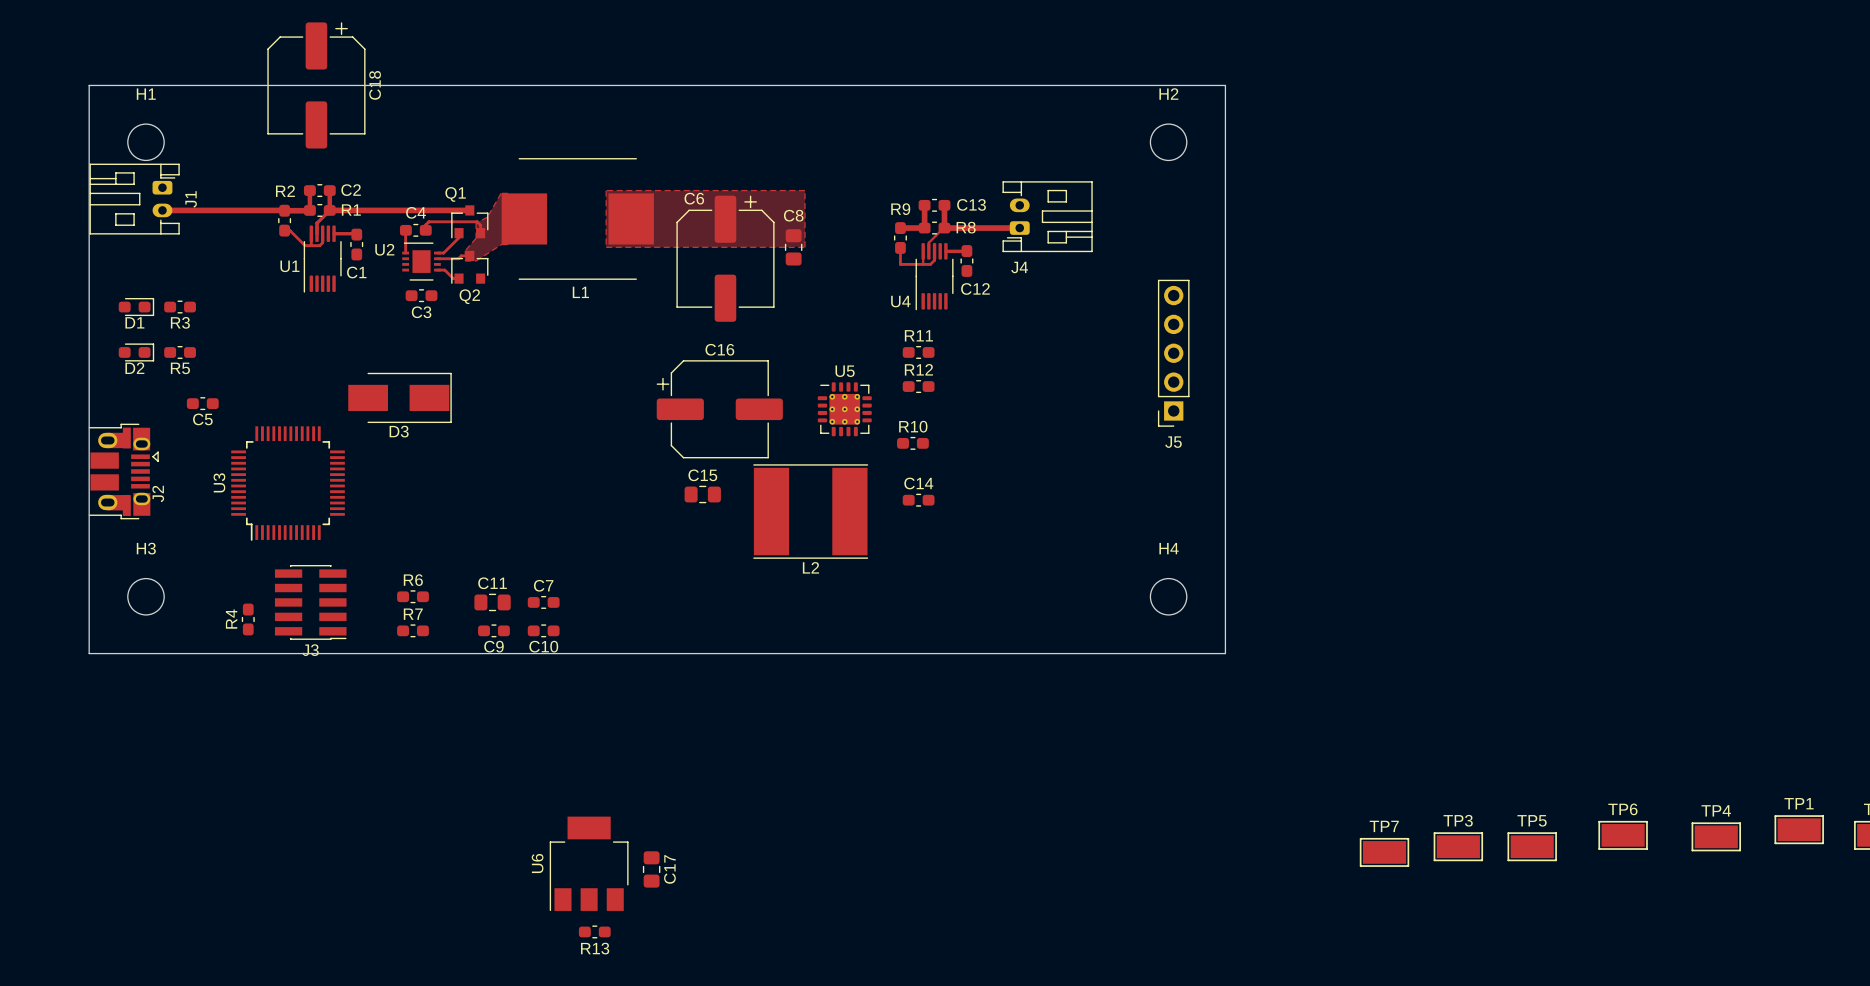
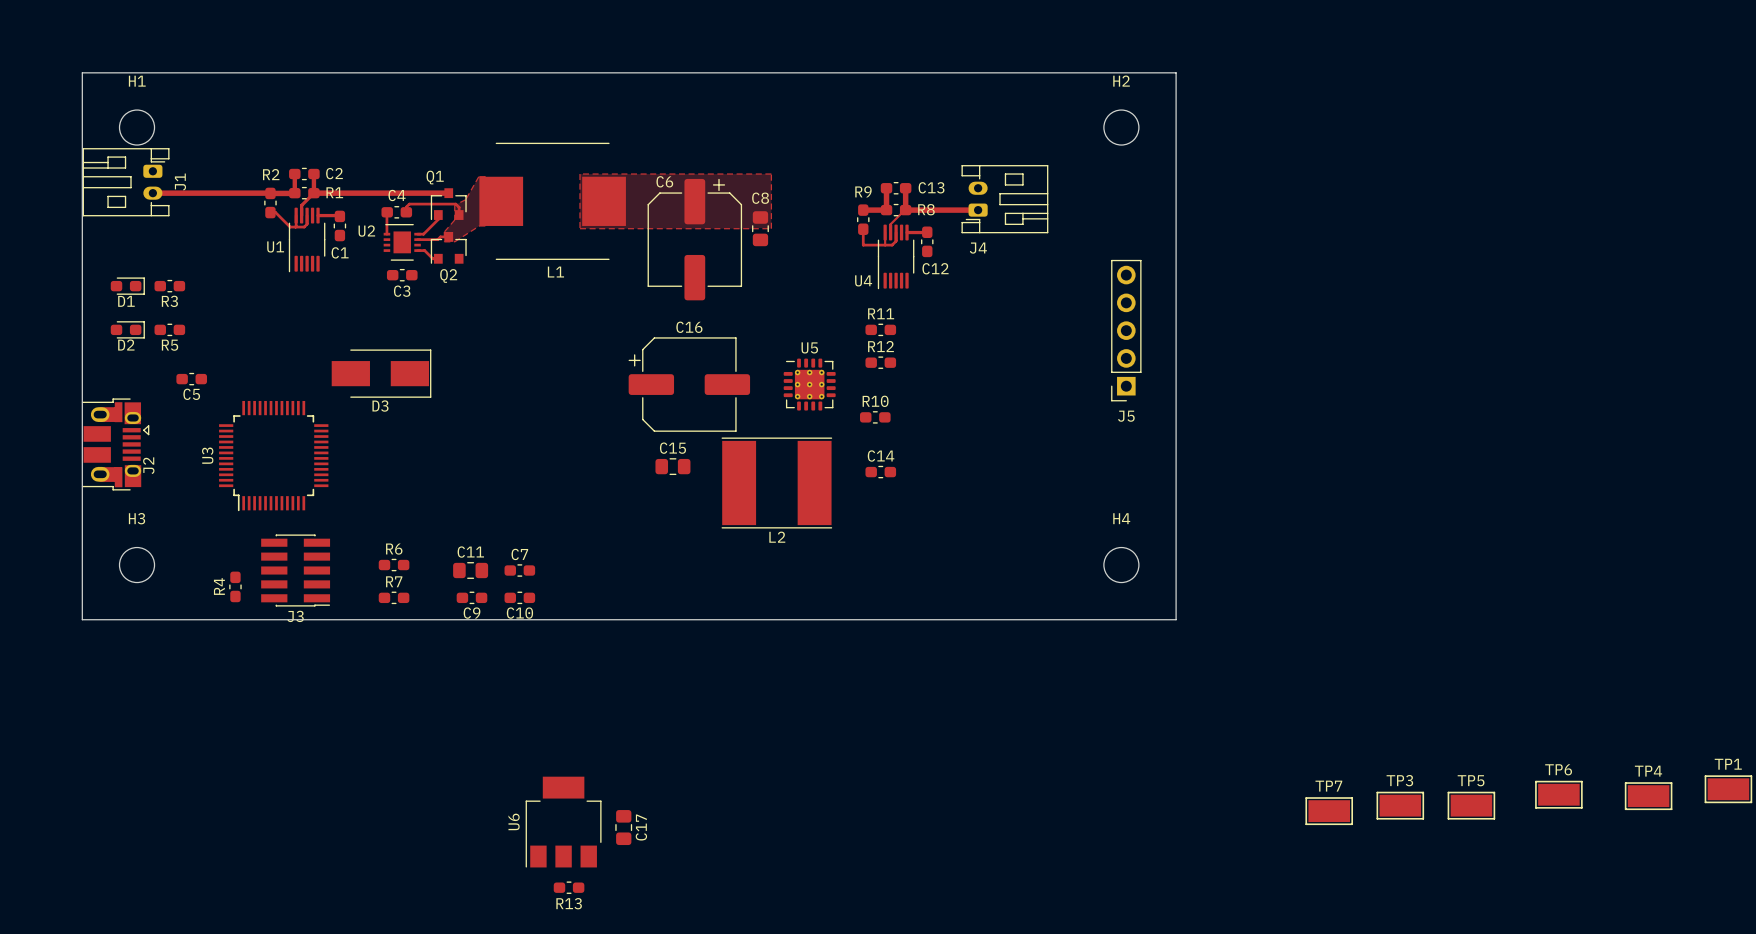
C18: (316, 85) -> none

